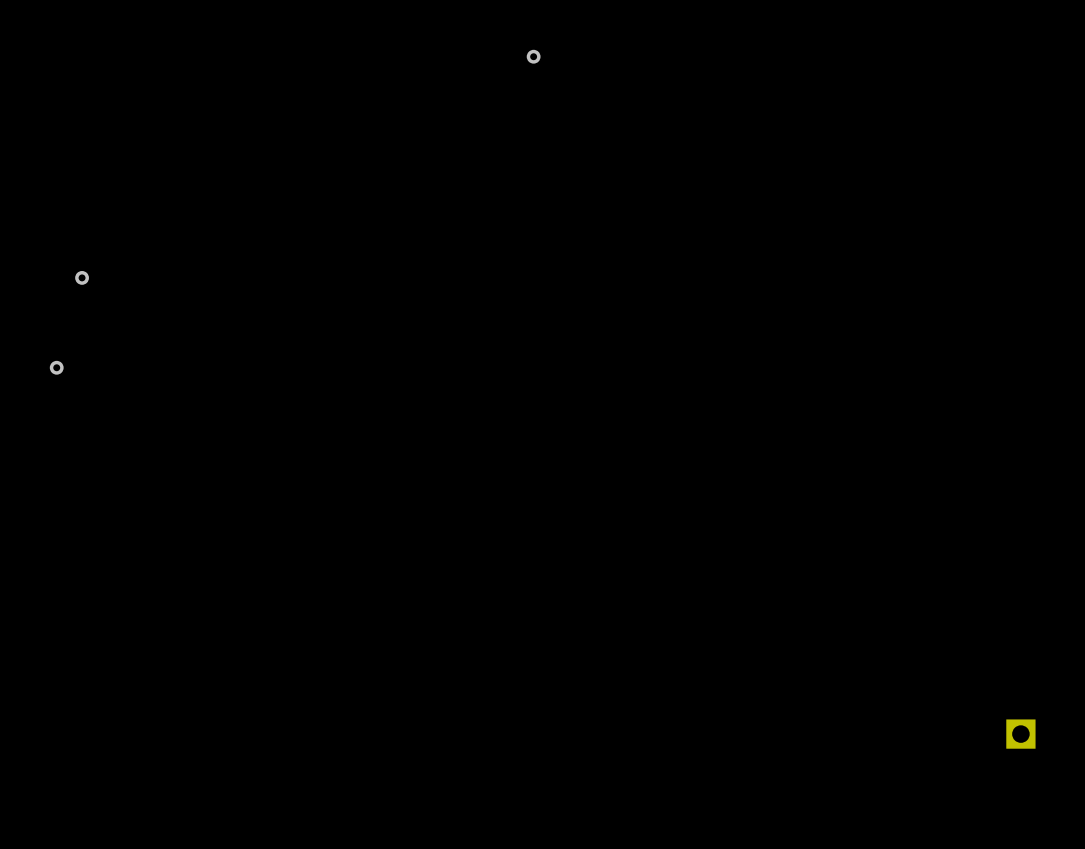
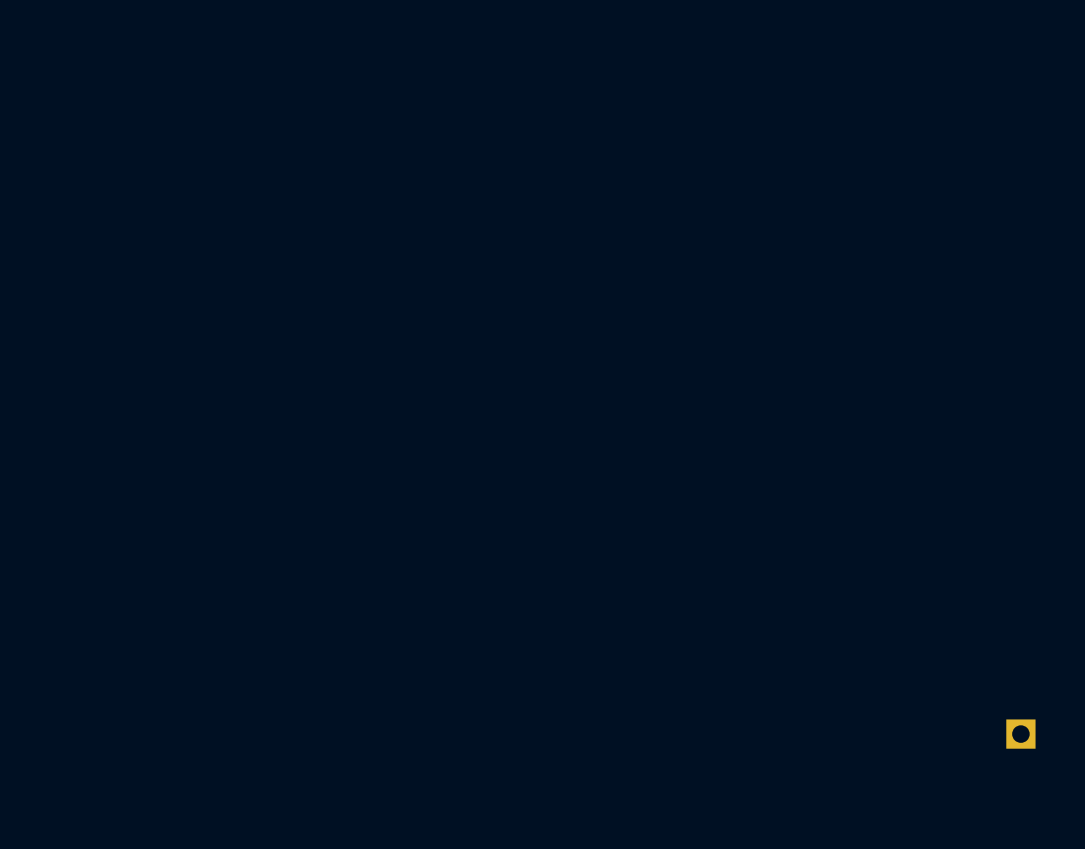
via: (533, 56) -> none
via: (82, 277) -> none
via: (56, 367) -> none

